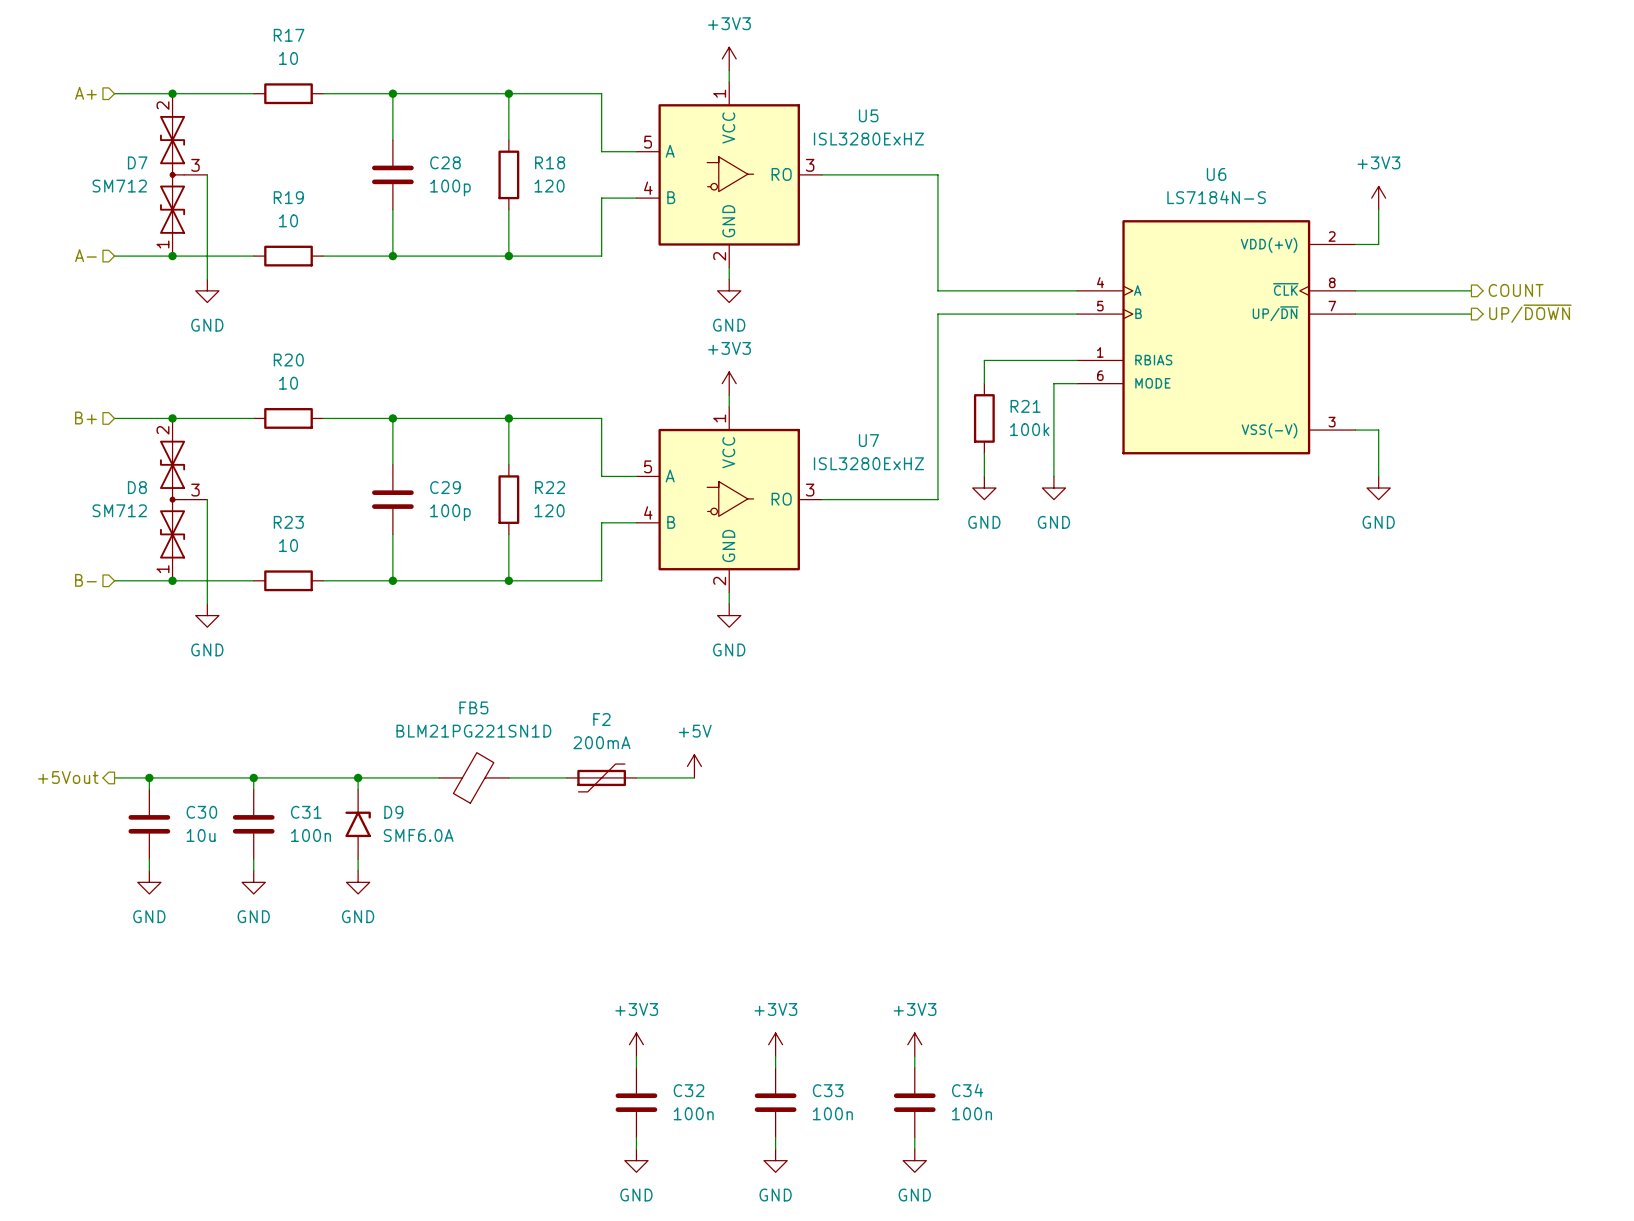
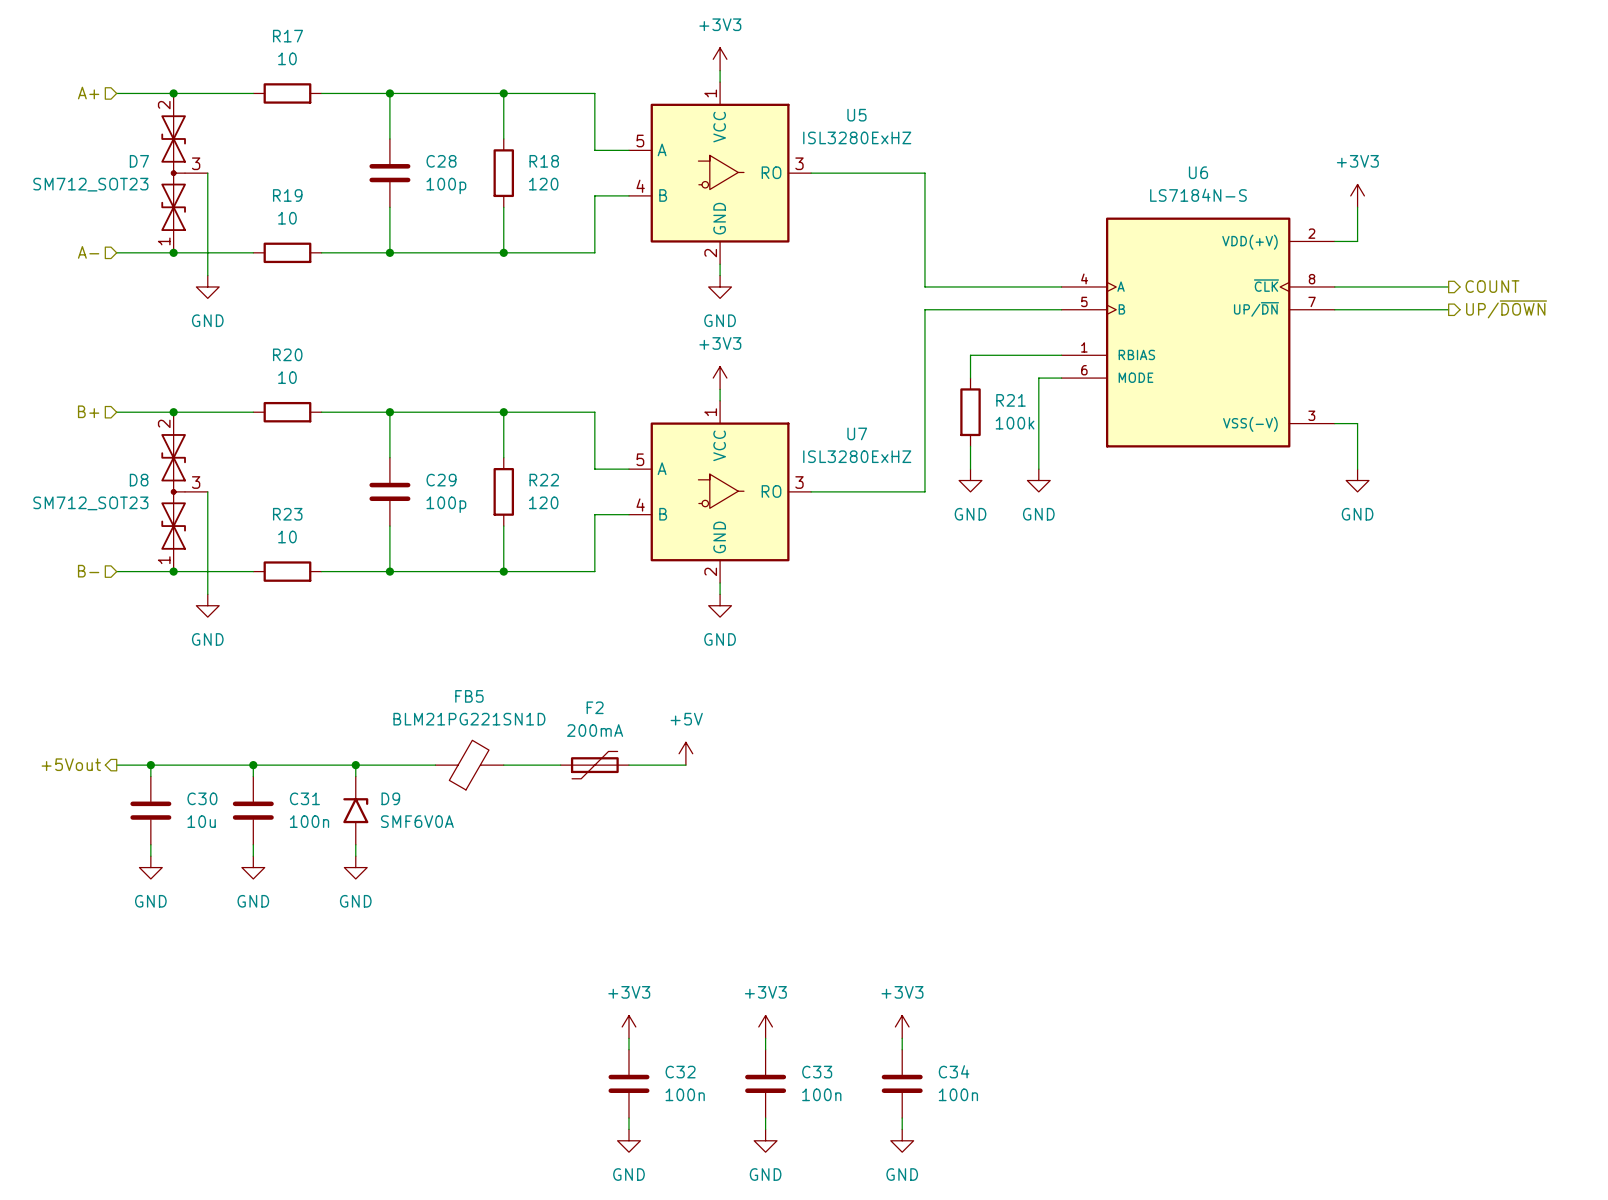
D7 value: SM712 (119, 186) -> SM712_SOT23 (90, 184)
D8 value: SM712 (119, 510) -> SM712_SOT23 (90, 503)
D9 value: SMF6.0A (418, 835) -> SMF6V0A (417, 821)

